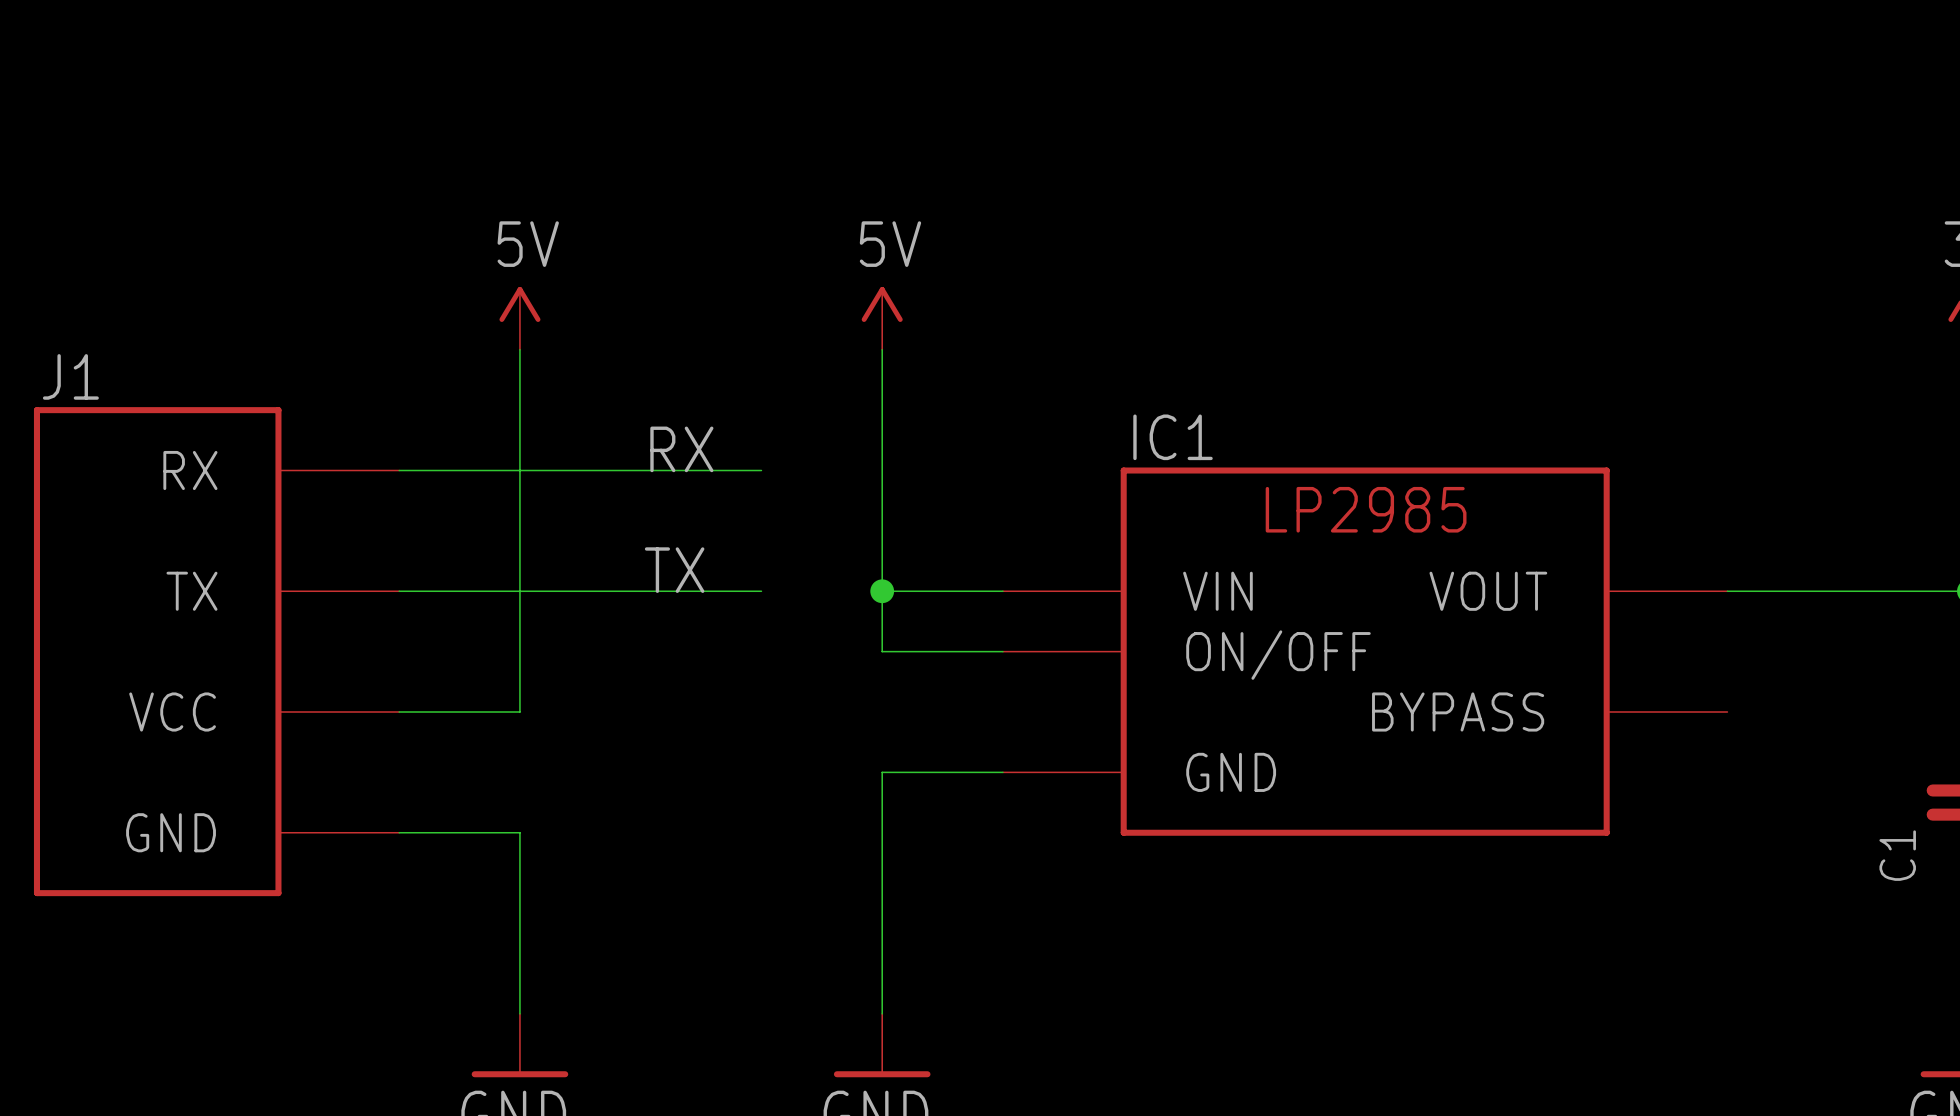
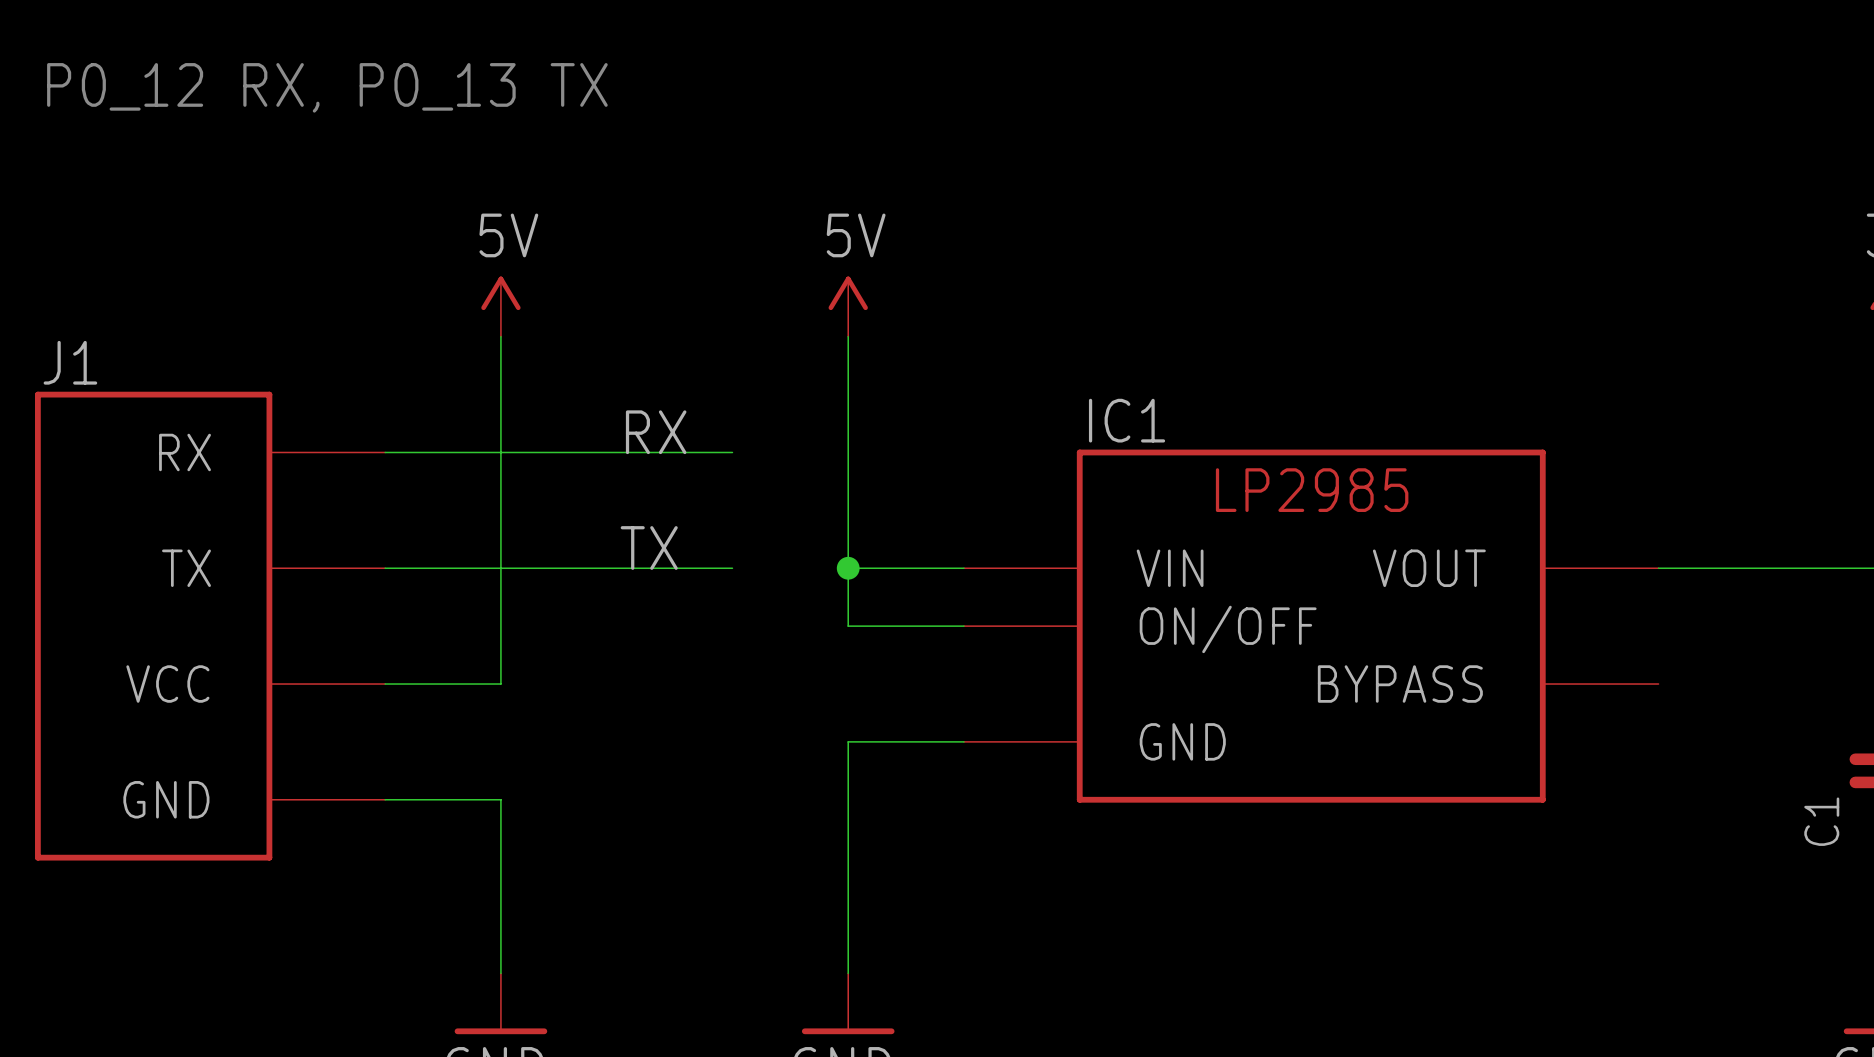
text: none -> P0_12 RX, P0_13 TX (327, 87)

